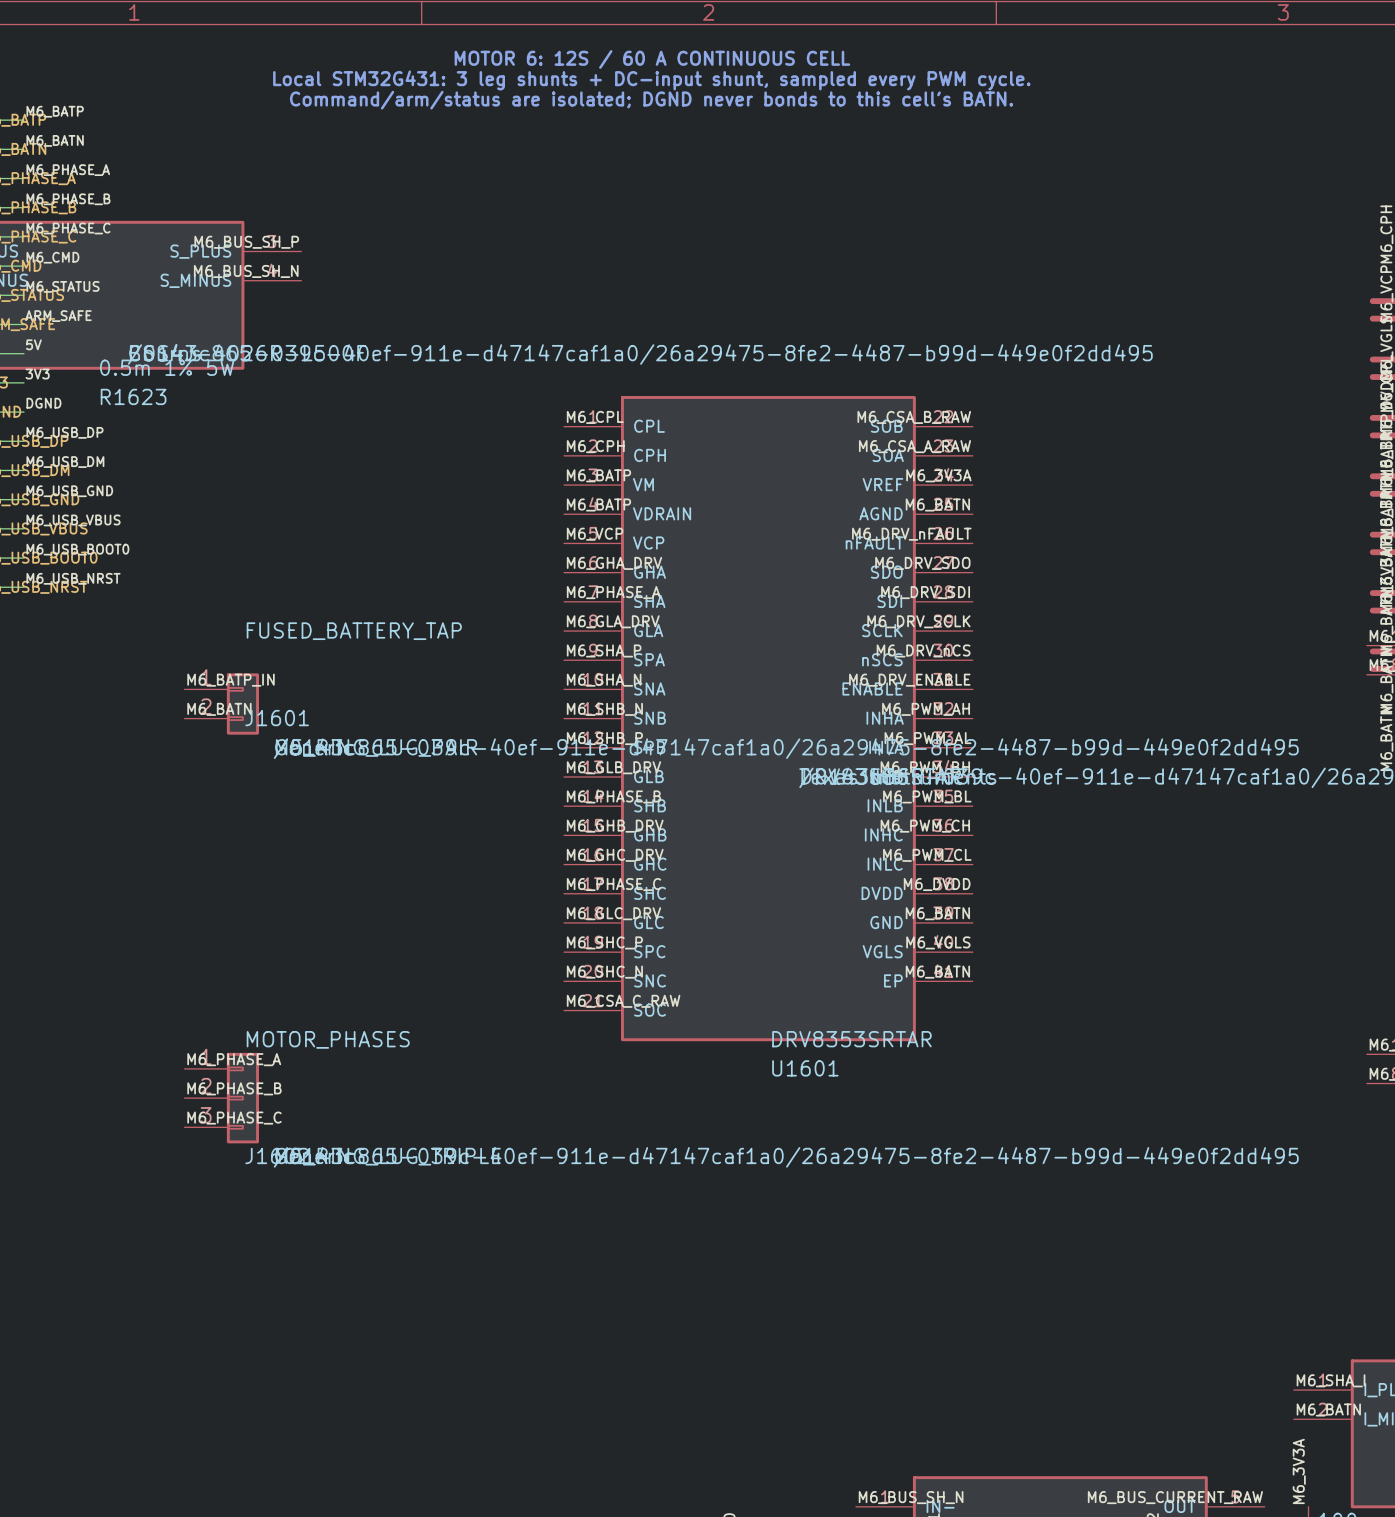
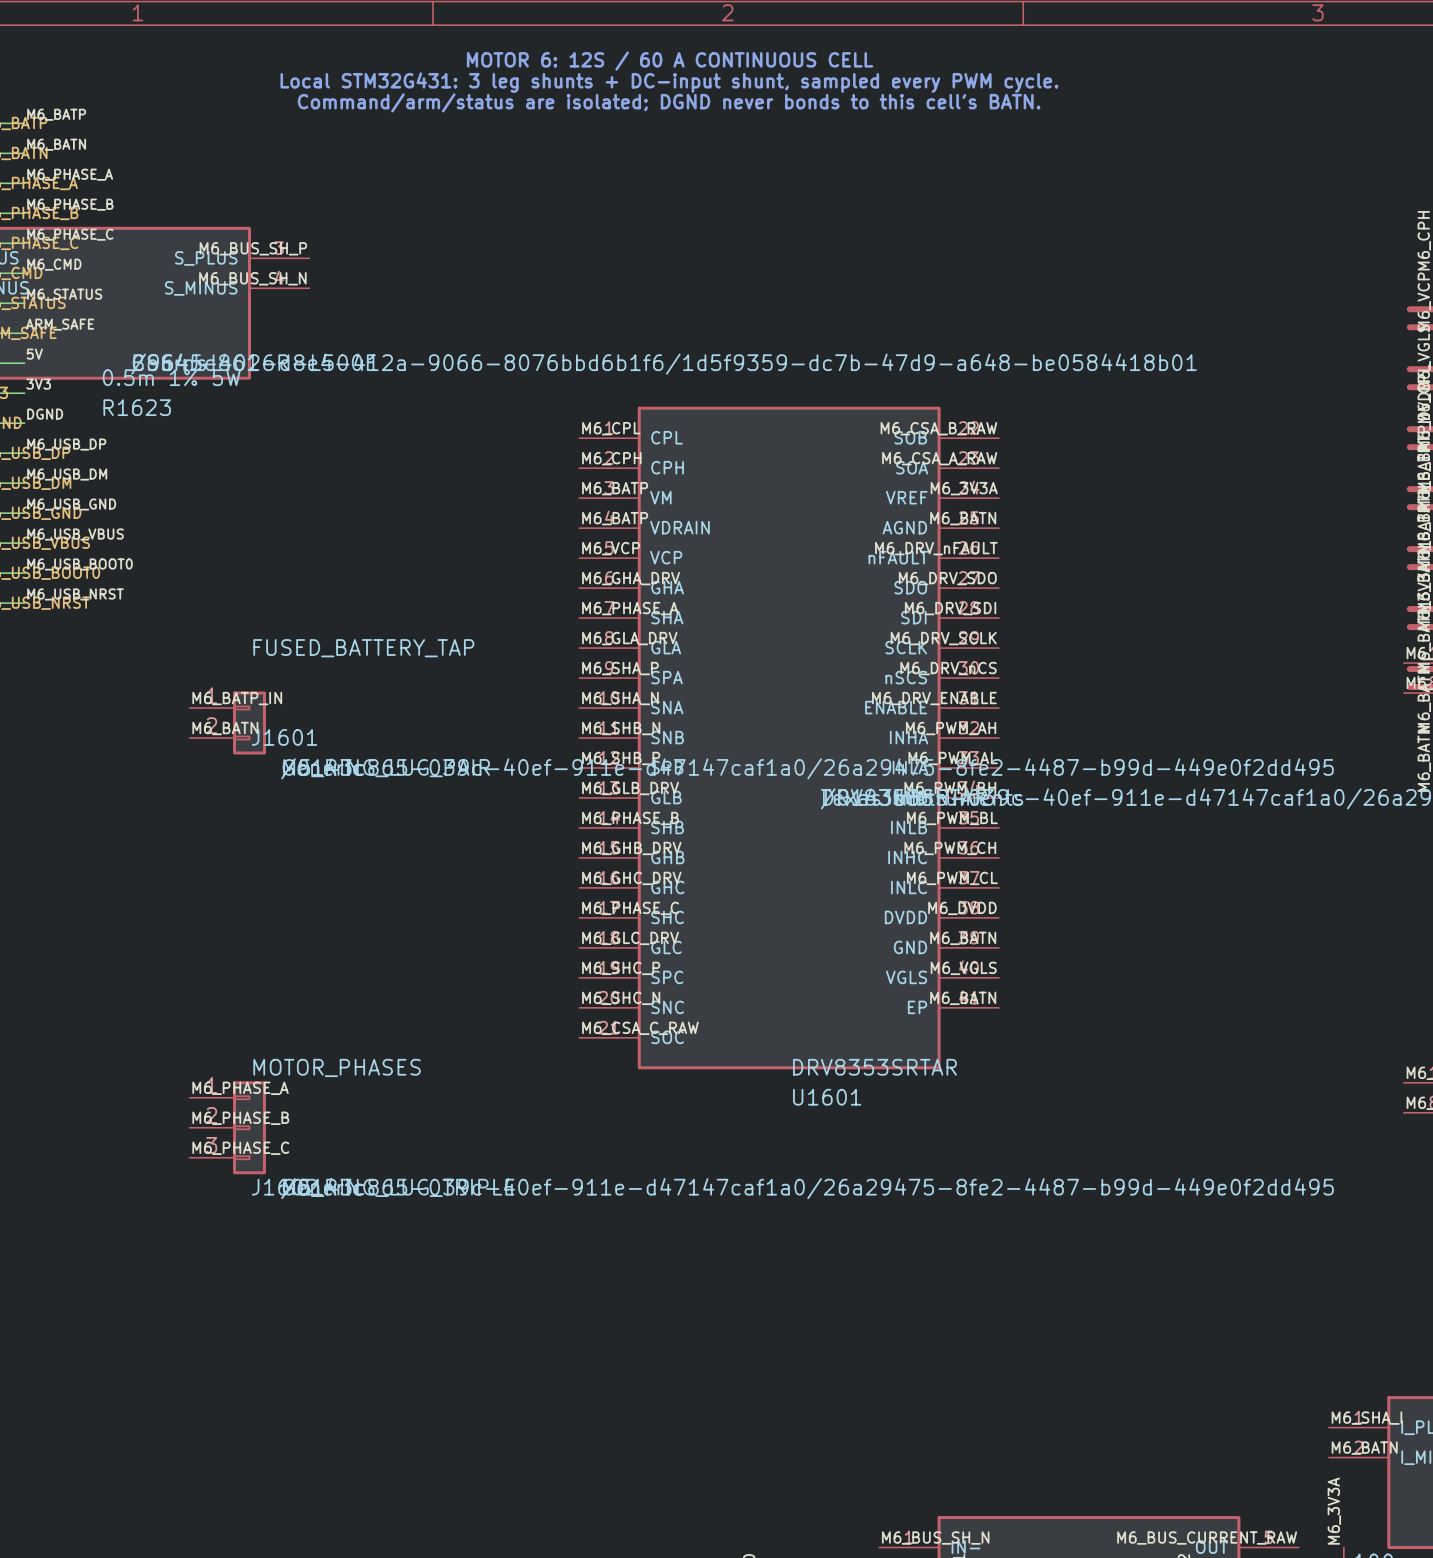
R1623 text: /0143c865-039c-40ef-911e-d47147caf1a0/26a29475-8fe2-4487-b99d-449e0f2dd495 (640, 354) -> /9645d861-d8e4-412a-9066-8076bbd6b1f6/1d5f9359-dc7b-47d9-a648-be0584418b01 (664, 364)

